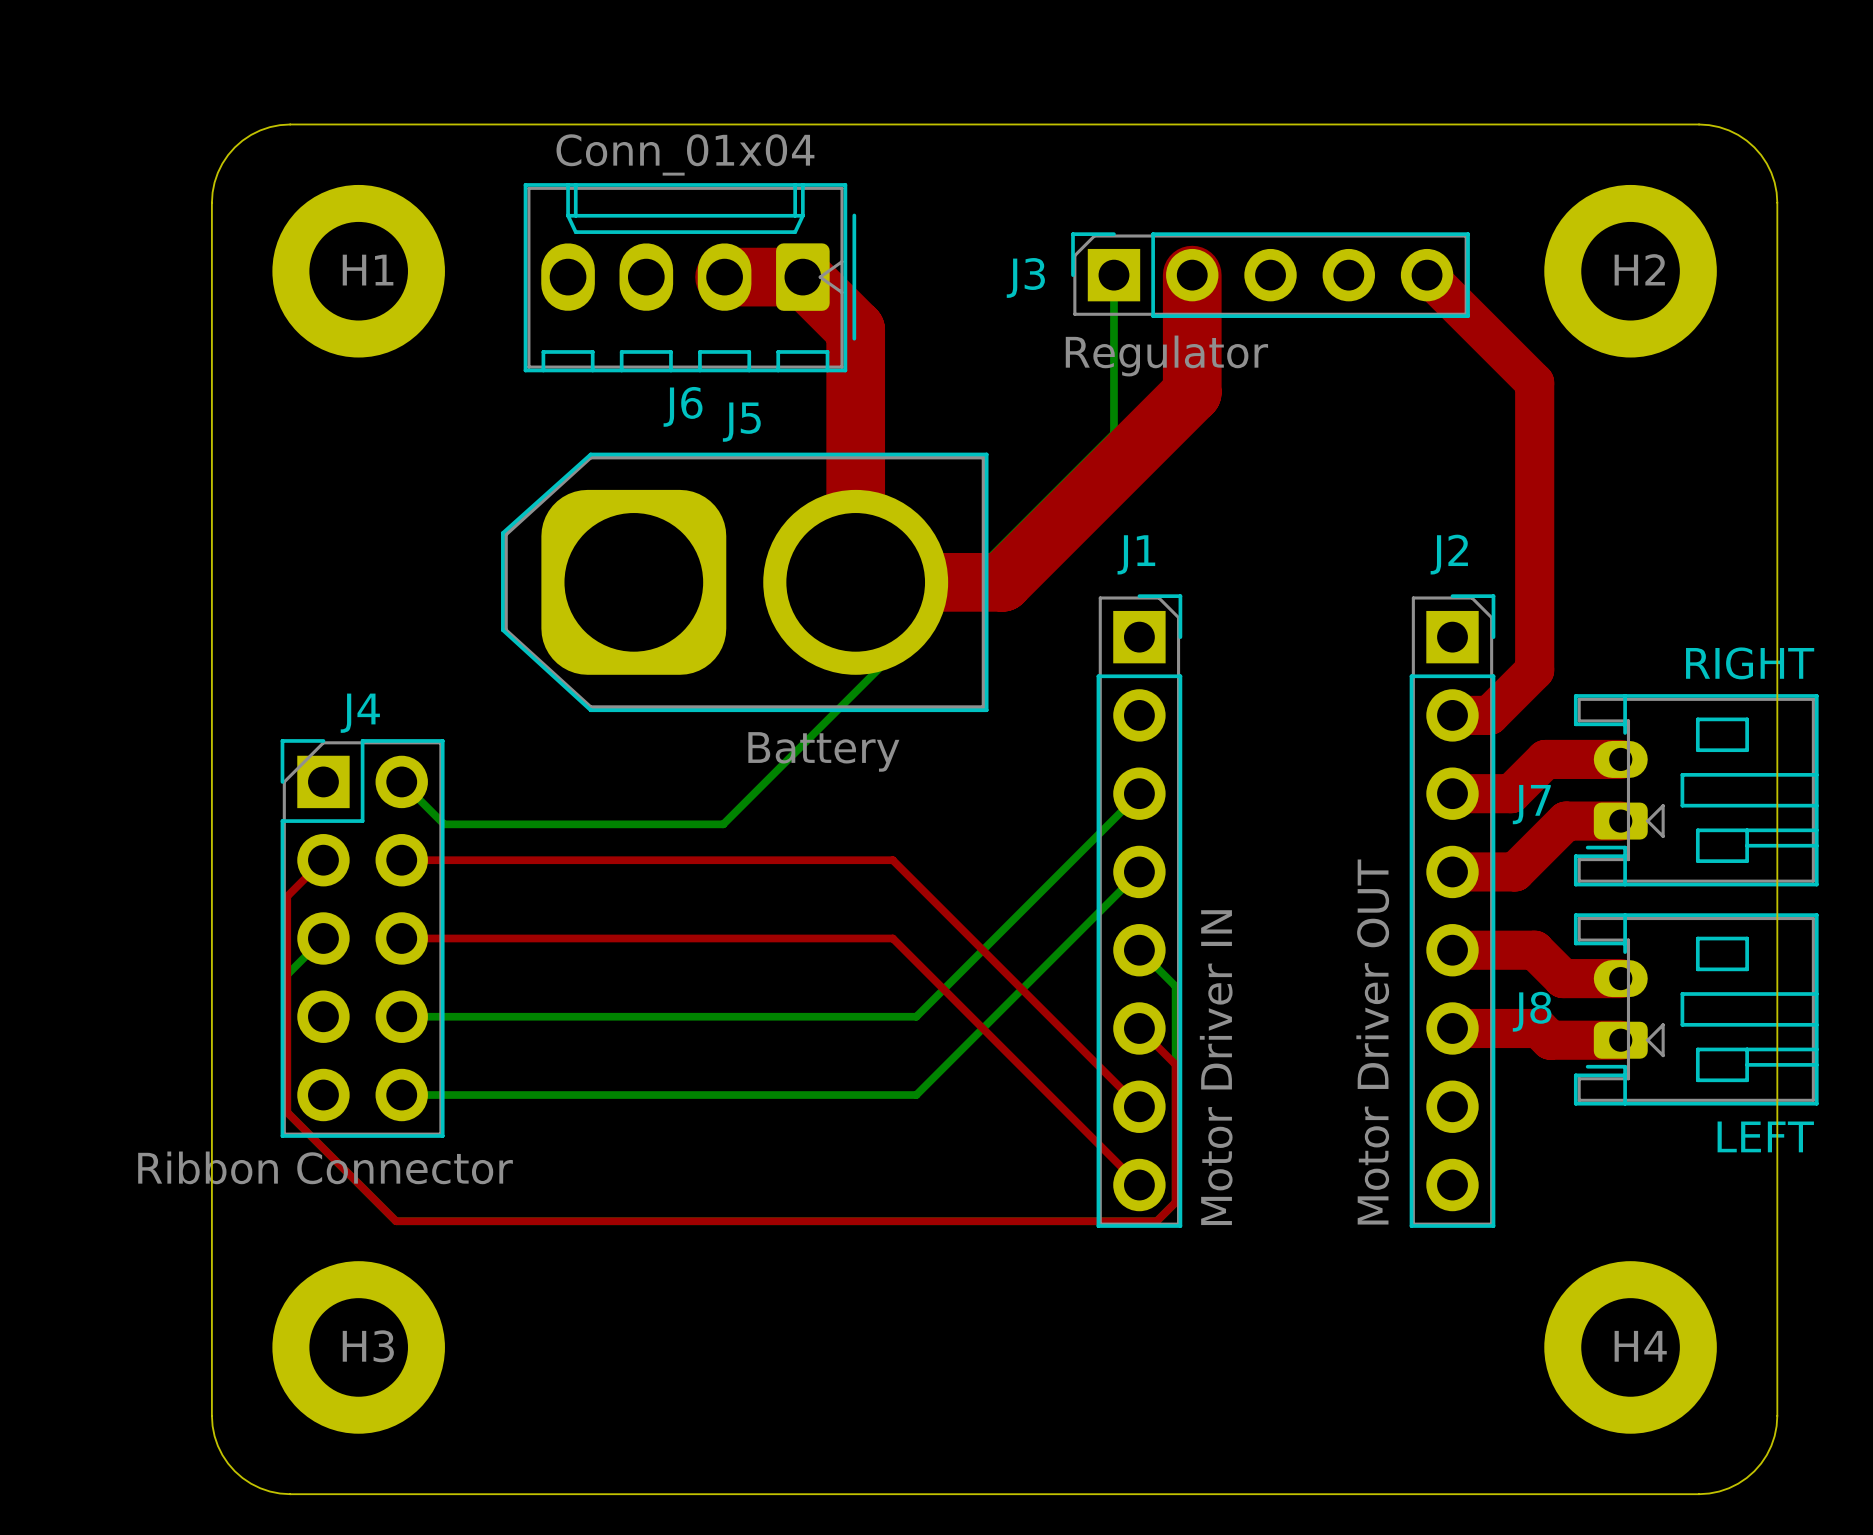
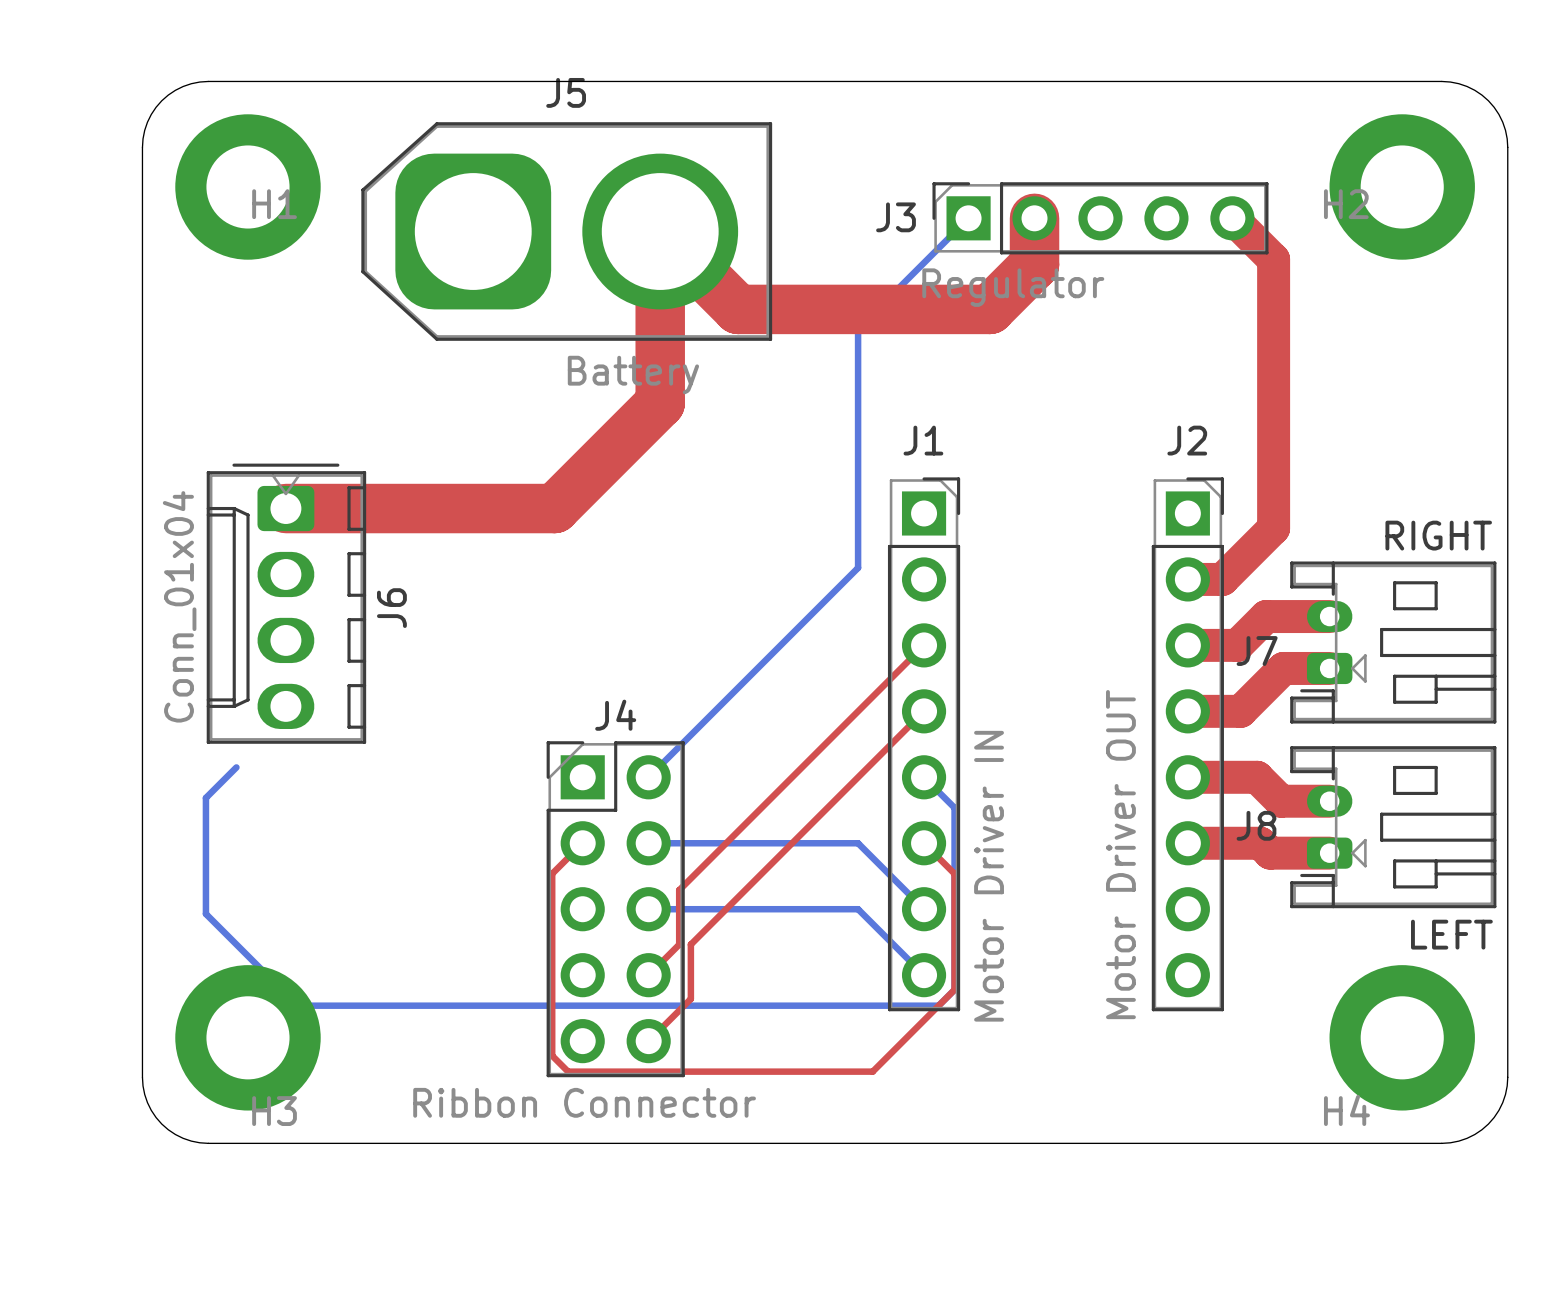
board edge: (1699, 124) (1729, 130) (1754, 147) (1771, 172) (1777, 202) (1777, 1415) (1774, 1436) (1766, 1455) (1746, 1478) (1719, 1491) (1699, 1494) (279, 1493) (260, 1488) (242, 1478) (228, 1463) (217, 1445) (211, 1415) (211, 1306) -> (1395, 81) (1450, 82) (1474, 90) (1488, 100) (1498, 114) (1507, 138) (1507, 1077) (1505, 1094) (1498, 1110) (1481, 1129) (1467, 1138) (1441, 1143) (208, 1143) (183, 1138) (161, 1124) (147, 1102) (142, 1077)
H1 position: (358, 271) -> (247, 186)
H2 position: (1630, 271) -> (1402, 186)
bottom track: (1113, 275) (1113, 433) (723, 824) (444, 824) (401, 781) -> none
top track: (1192, 275) (1192, 392) (1002, 582) (855, 582) (855, 329) (802, 277) (724, 277) -> none
J3 position: (1270, 275) -> (1100, 218)
top track: (1427, 275) (1534, 382) (1534, 670) (1489, 715) -> (1232, 218) (1273, 259) (1273, 528) (1222, 579) (1219, 579)
J6 rotation: 0° (689, 277) -> 90° counterclockwise (286, 603)
J6 position: (689, 277) -> (286, 603)
bottom track: none -> (968, 218) (858, 328) (858, 567) (648, 777)
top track: none -> (1034, 218) (1034, 264) (989, 309) (738, 309) (660, 231) (660, 403) (554, 508) (285, 508)
J5 position: (744, 582) -> (566, 231)
bottom track: (1139, 793) (916, 1016) (401, 1016) -> none
top track: none -> (924, 645) (679, 890) (679, 944) (648, 975)
top track: (323, 860) (287, 896) (287, 1112) (396, 1221) (1156, 1221) -> (582, 843) (552, 873) (552, 1055) (568, 1071) (872, 1071) (938, 1005)
top track: (401, 860) (892, 860) (1139, 1106) -> none
bottom track: (1139, 871) (916, 1095) (401, 1095) -> none
top track: none -> (924, 711) (690, 944) (690, 998) (648, 1041)
J4 position: (362, 938) -> (615, 909)
top track: (401, 938) (892, 938) (1139, 1185) -> none
bottom track: none -> (648, 843) (858, 843) (924, 909)
bottom track: none -> (648, 909) (858, 909) (924, 975)
H3 position: (358, 1347) -> (247, 1037)
H4 position: (1630, 1347) -> (1402, 1037)

